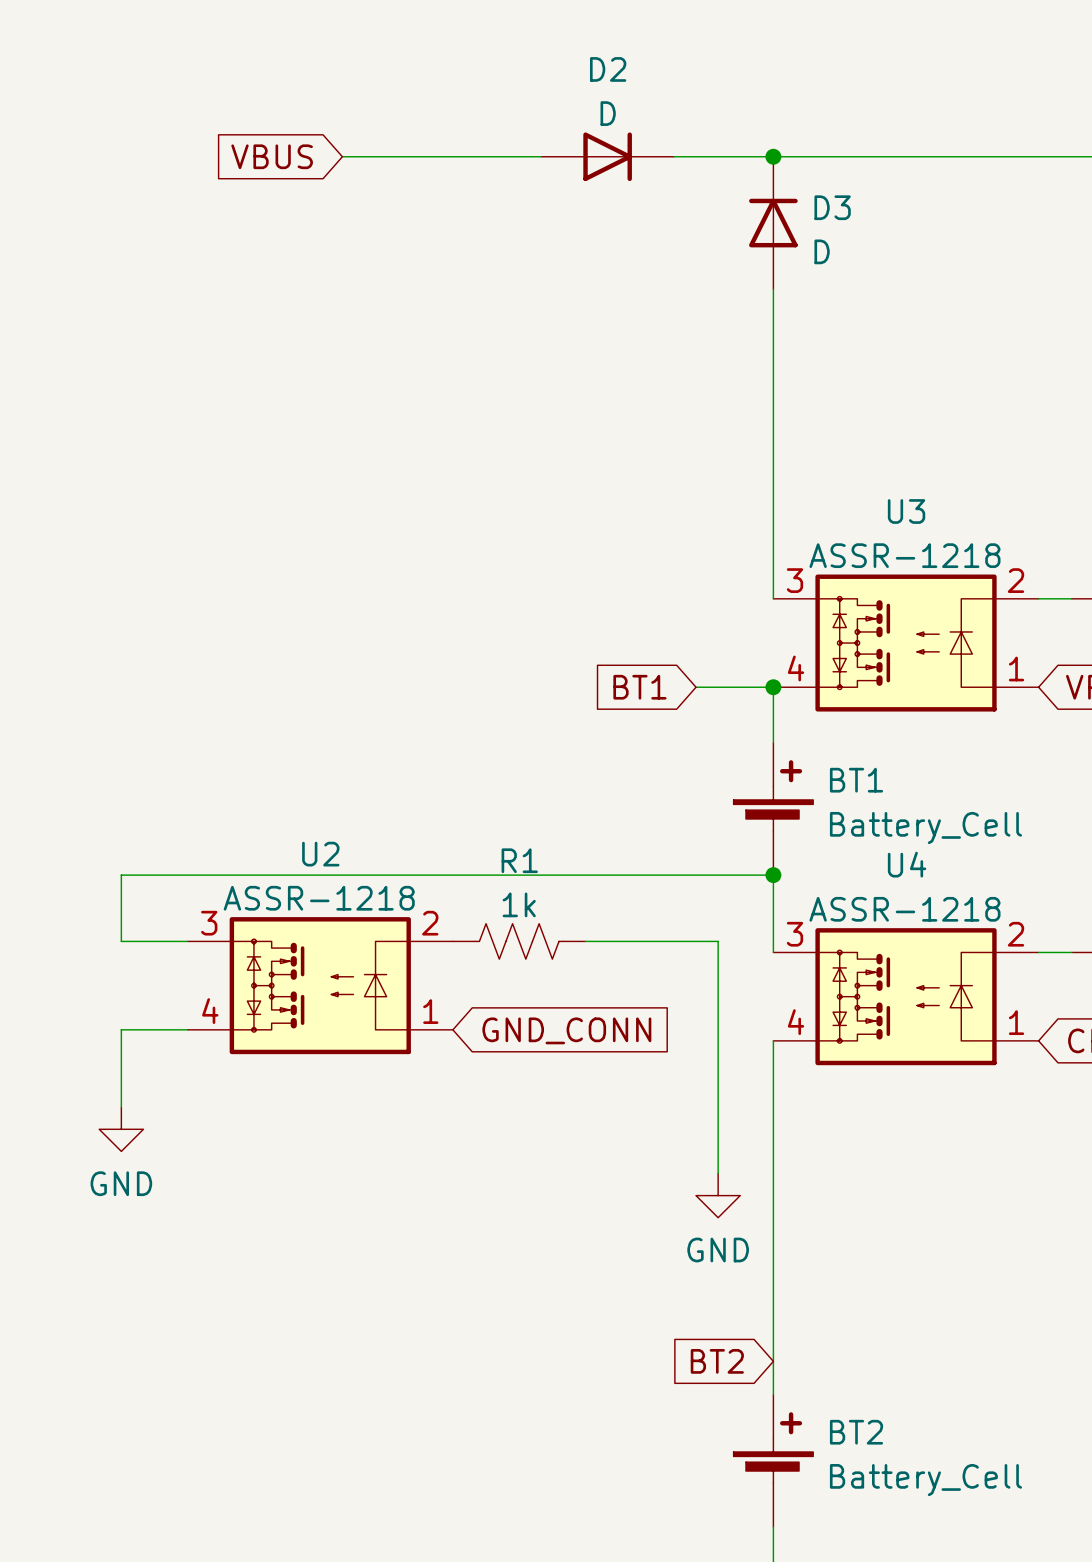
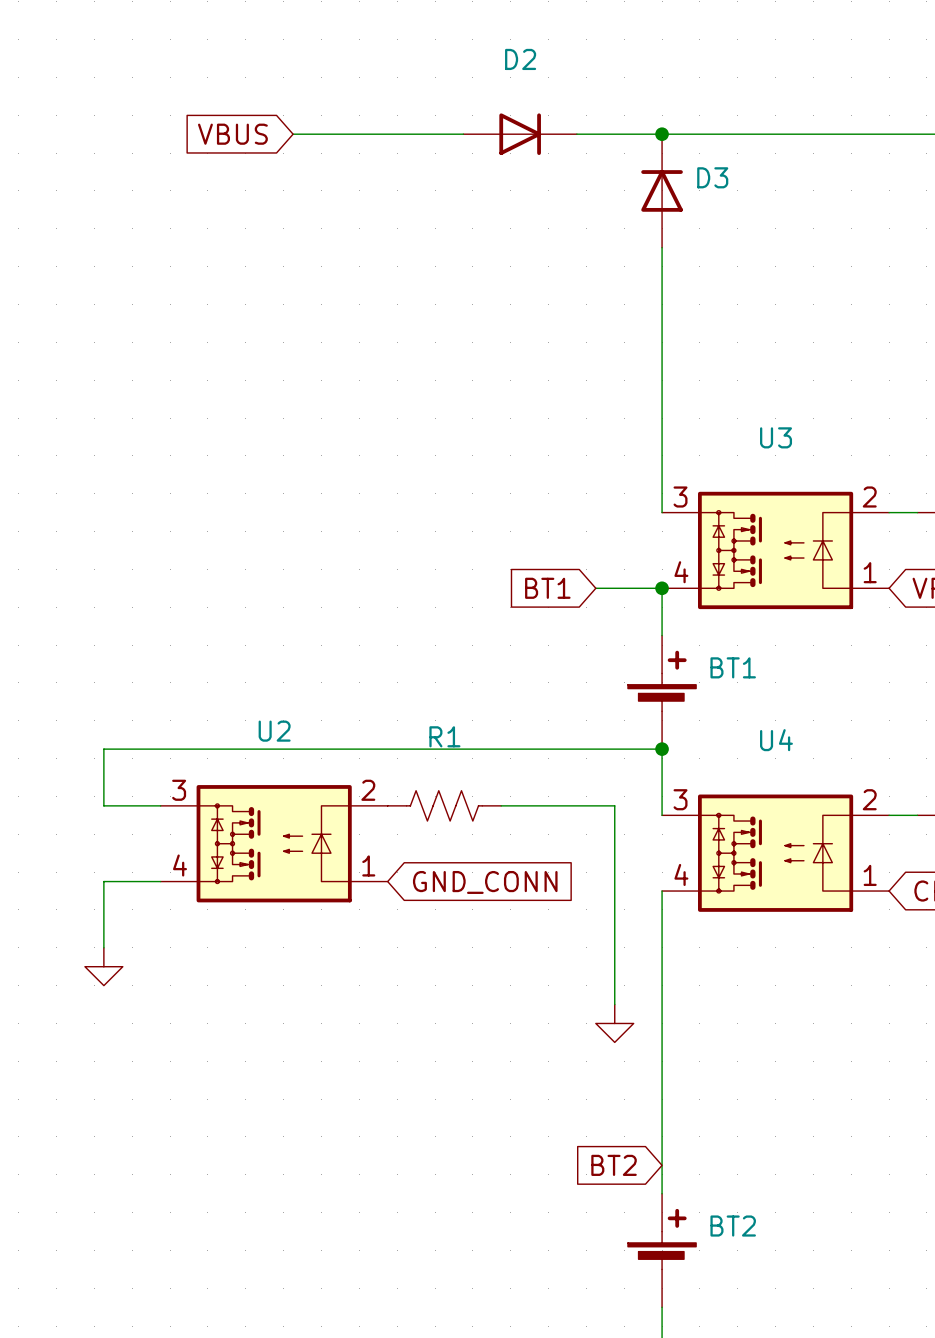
D2 value: D (608, 113) -> none
D3 value: D (822, 251) -> none
U3 value: ASSR-1218 (904, 555) -> none
BT1 value: Battery_Cell (925, 828) -> none
U2 value: ASSR-1218 (319, 898) -> none
R1 value: 1k (519, 904) -> none
U4 value: ASSR-1218 (904, 909) -> none
power symbol text: GND (121, 1183) -> none
power symbol text: GND (718, 1250) -> none
BT2 value: Battery_Cell (925, 1480) -> none

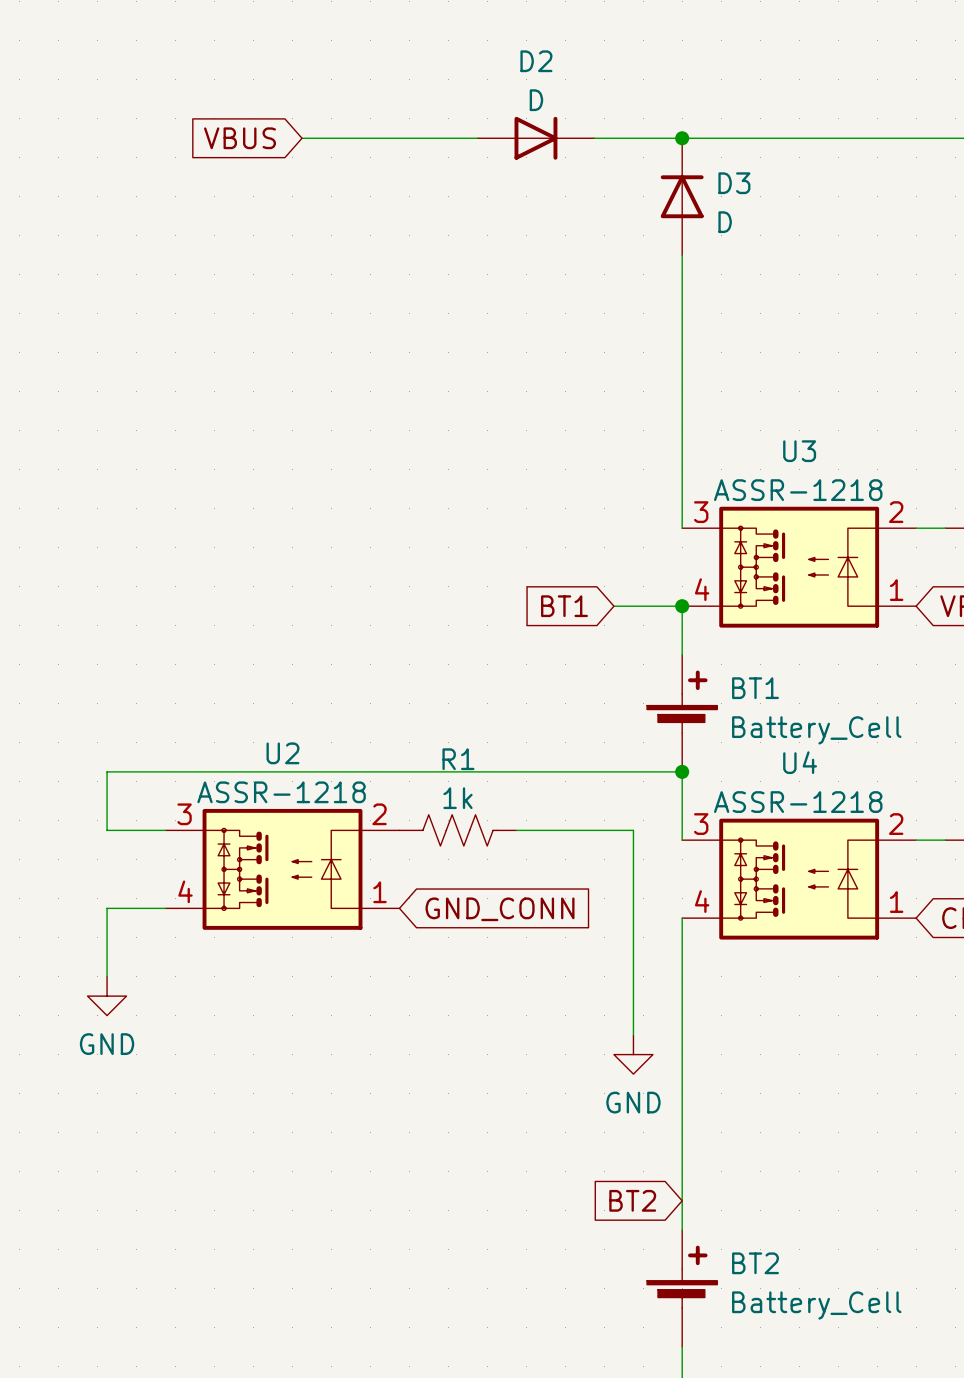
D2 value: none -> D (536, 100)
D3 value: none -> D (725, 222)
U3 value: none -> ASSR-1218 (798, 490)
BT1 value: none -> Battery_Cell (816, 730)
U2 value: none -> ASSR-1218 (281, 792)
R1 value: none -> 1k (457, 798)
U4 value: none -> ASSR-1218 (798, 802)
power symbol text: none -> GND (107, 1044)
power symbol text: none -> GND (633, 1102)
BT2 value: none -> Battery_Cell (816, 1305)

